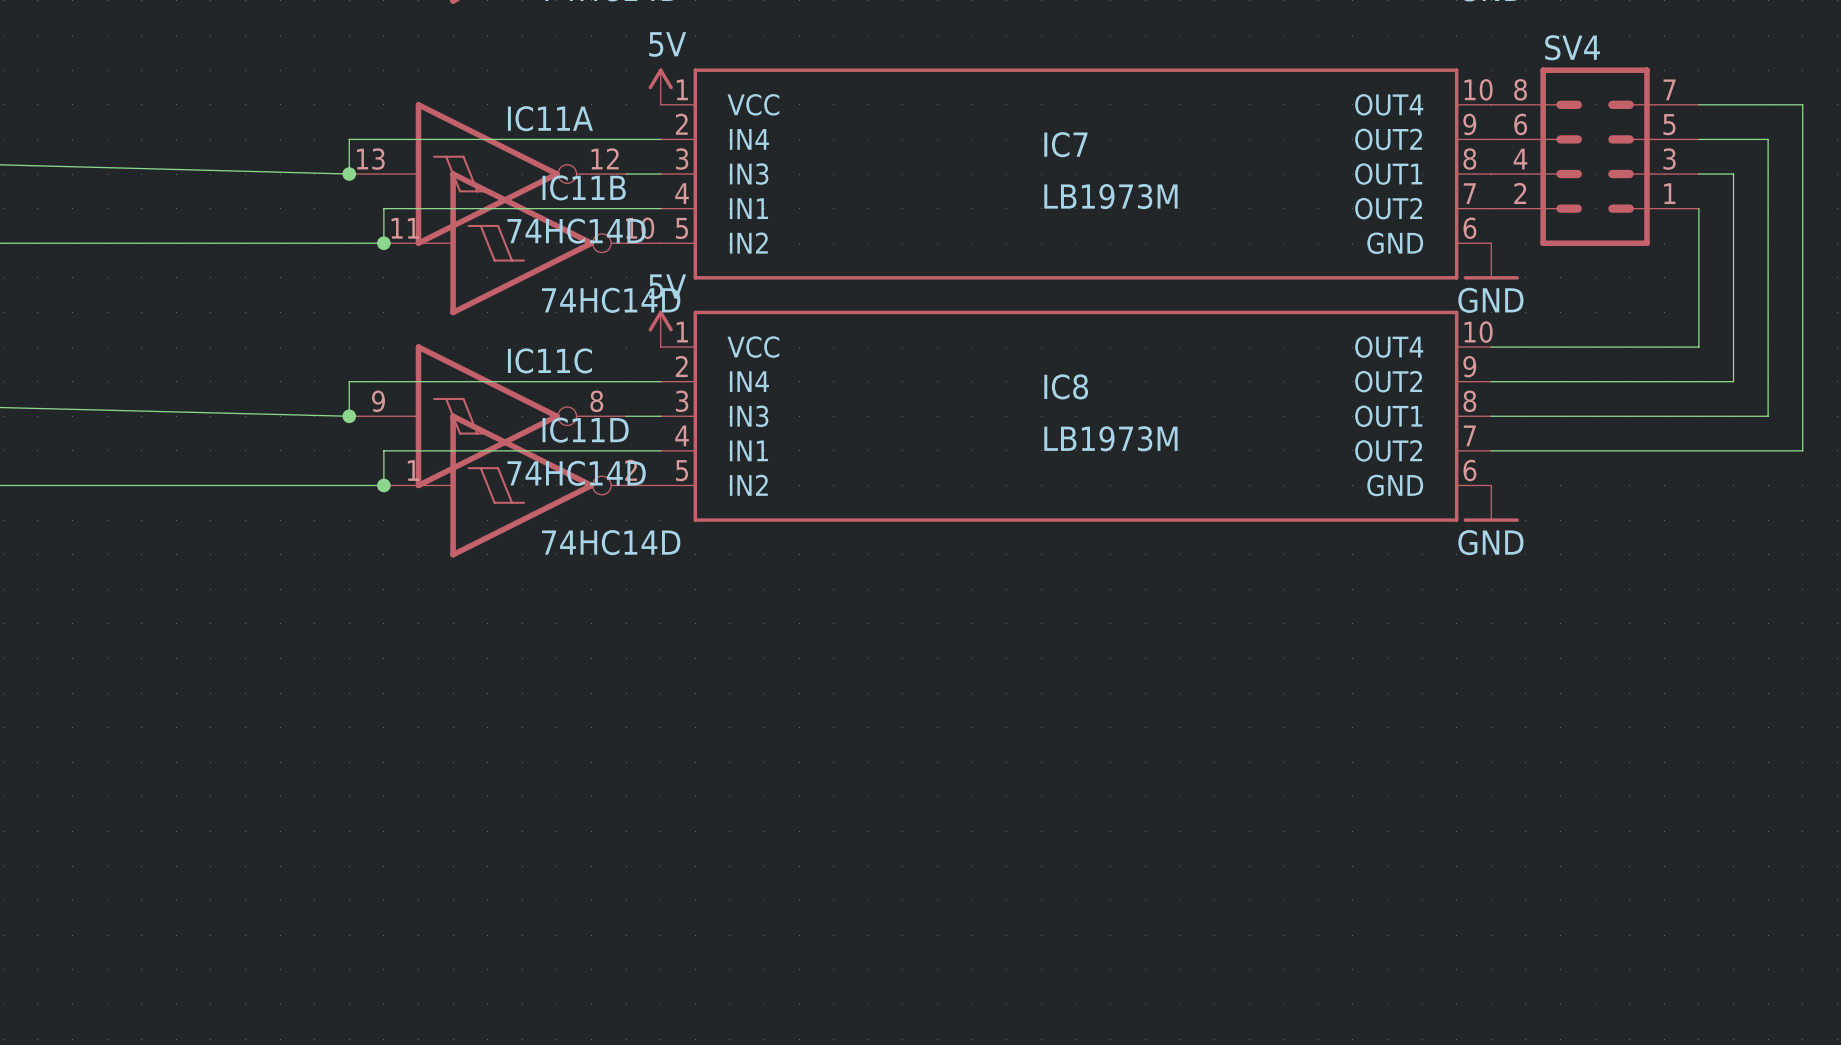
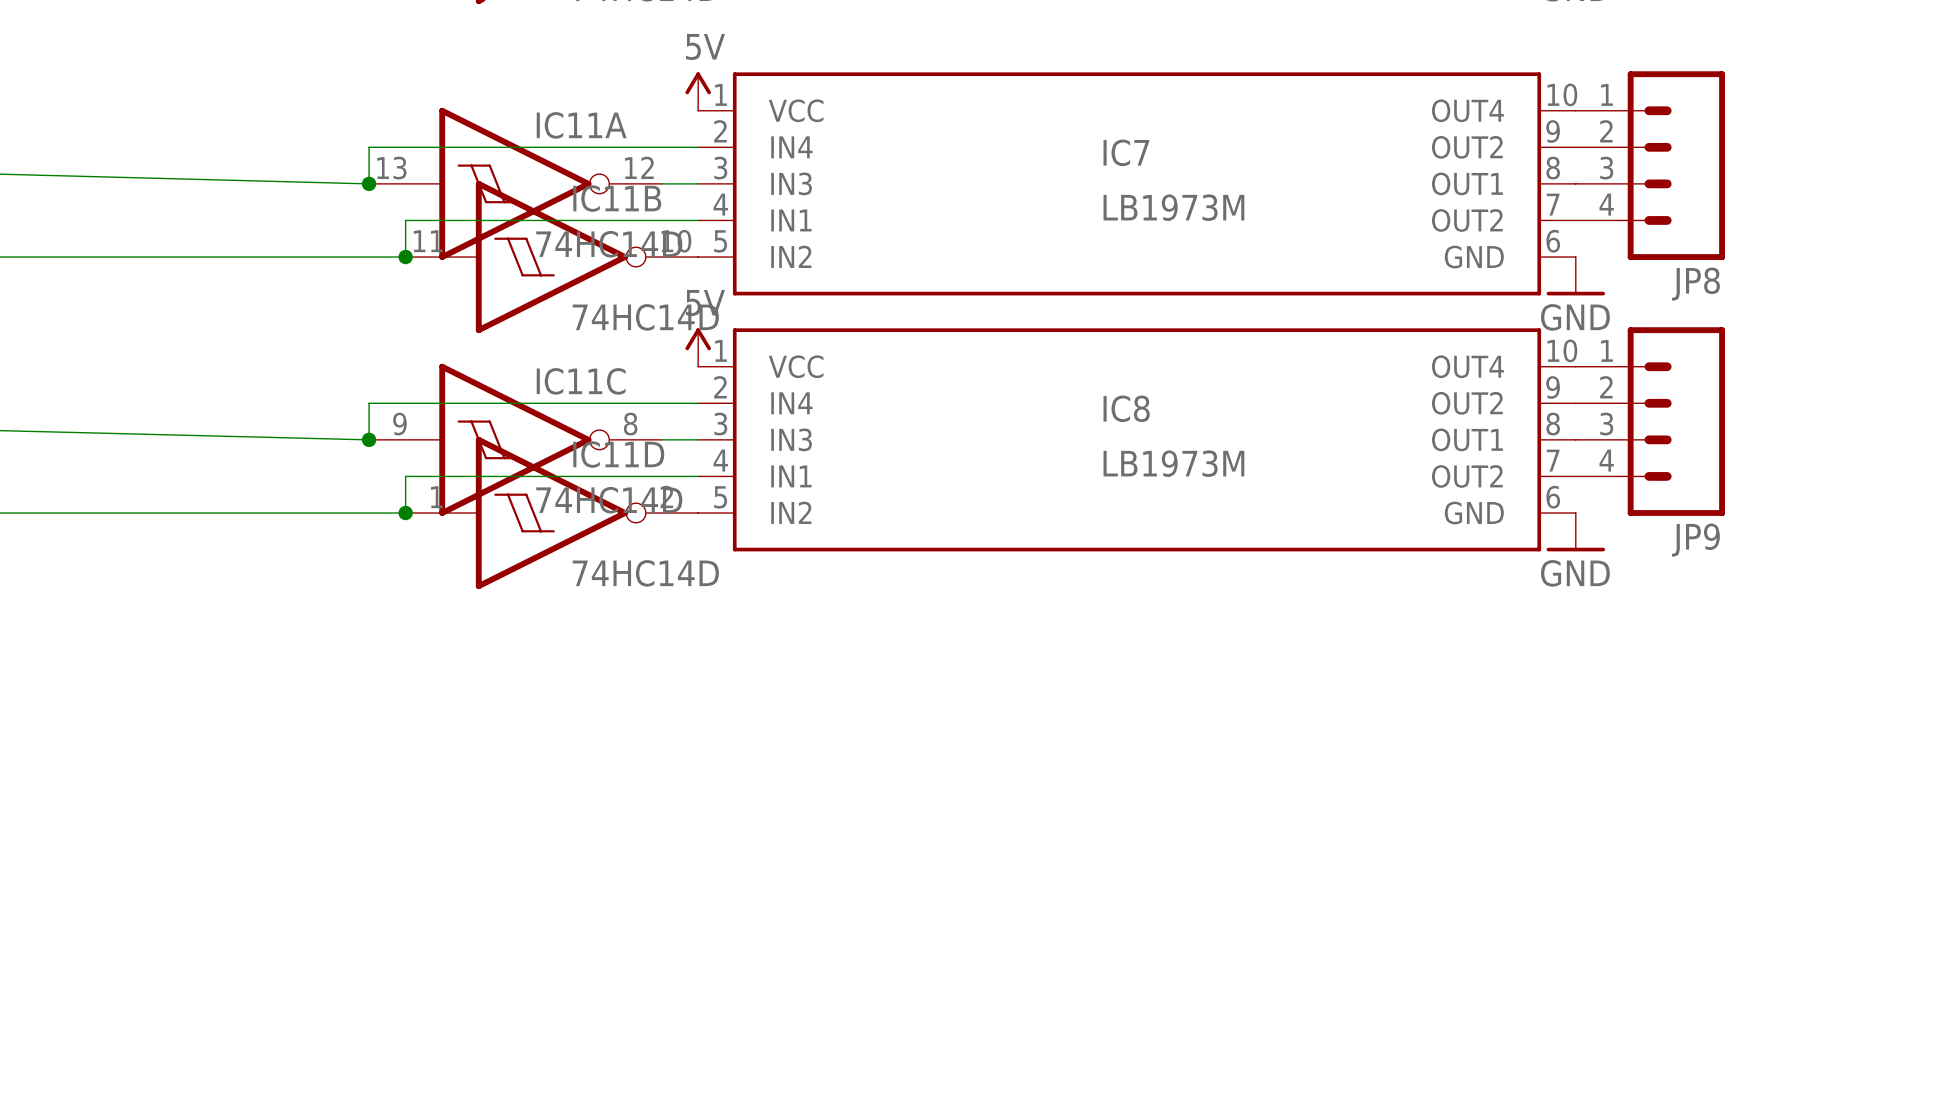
wire: (1698, 104) (1802, 104) (1802, 450) (1491, 450) -> none
wire: (1698, 139) (1768, 139) (1768, 416) (1491, 416) -> none
JP8: none -> (1650, 165)
SV4: (1595, 156) -> none
wire: (1698, 174) (1733, 174) (1733, 381) (1491, 381) -> none
wire: (1698, 208) (1698, 347) (1491, 347) -> none
JP9: none -> (1650, 421)

